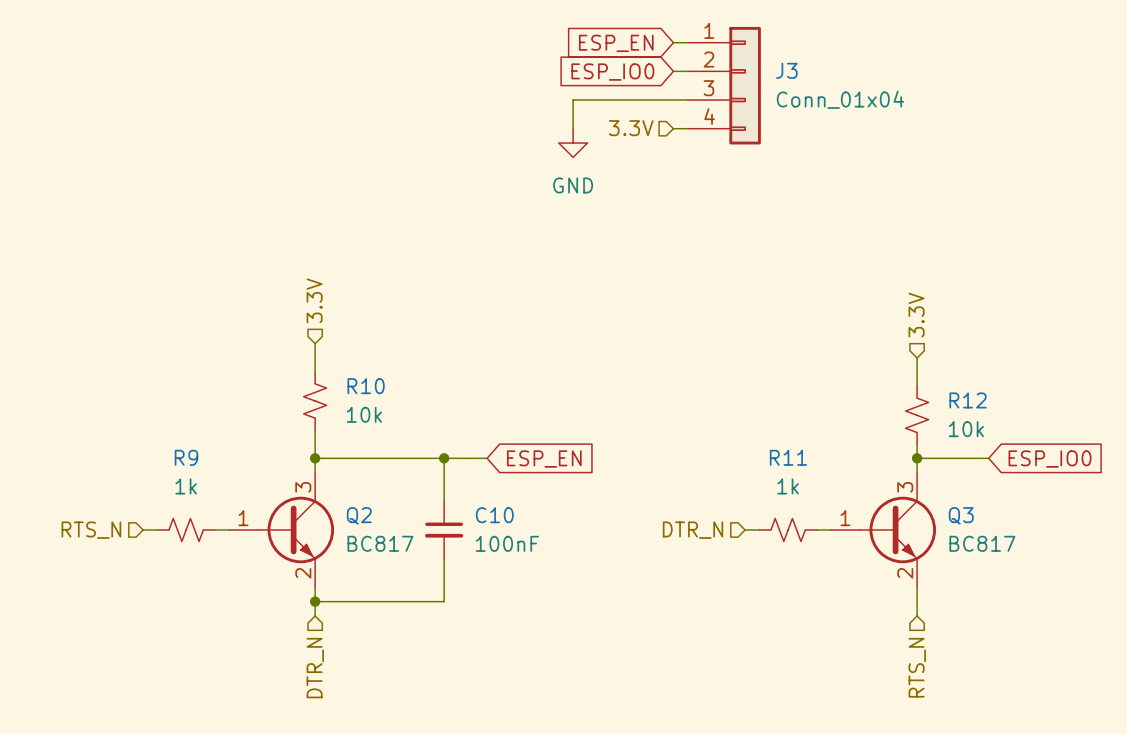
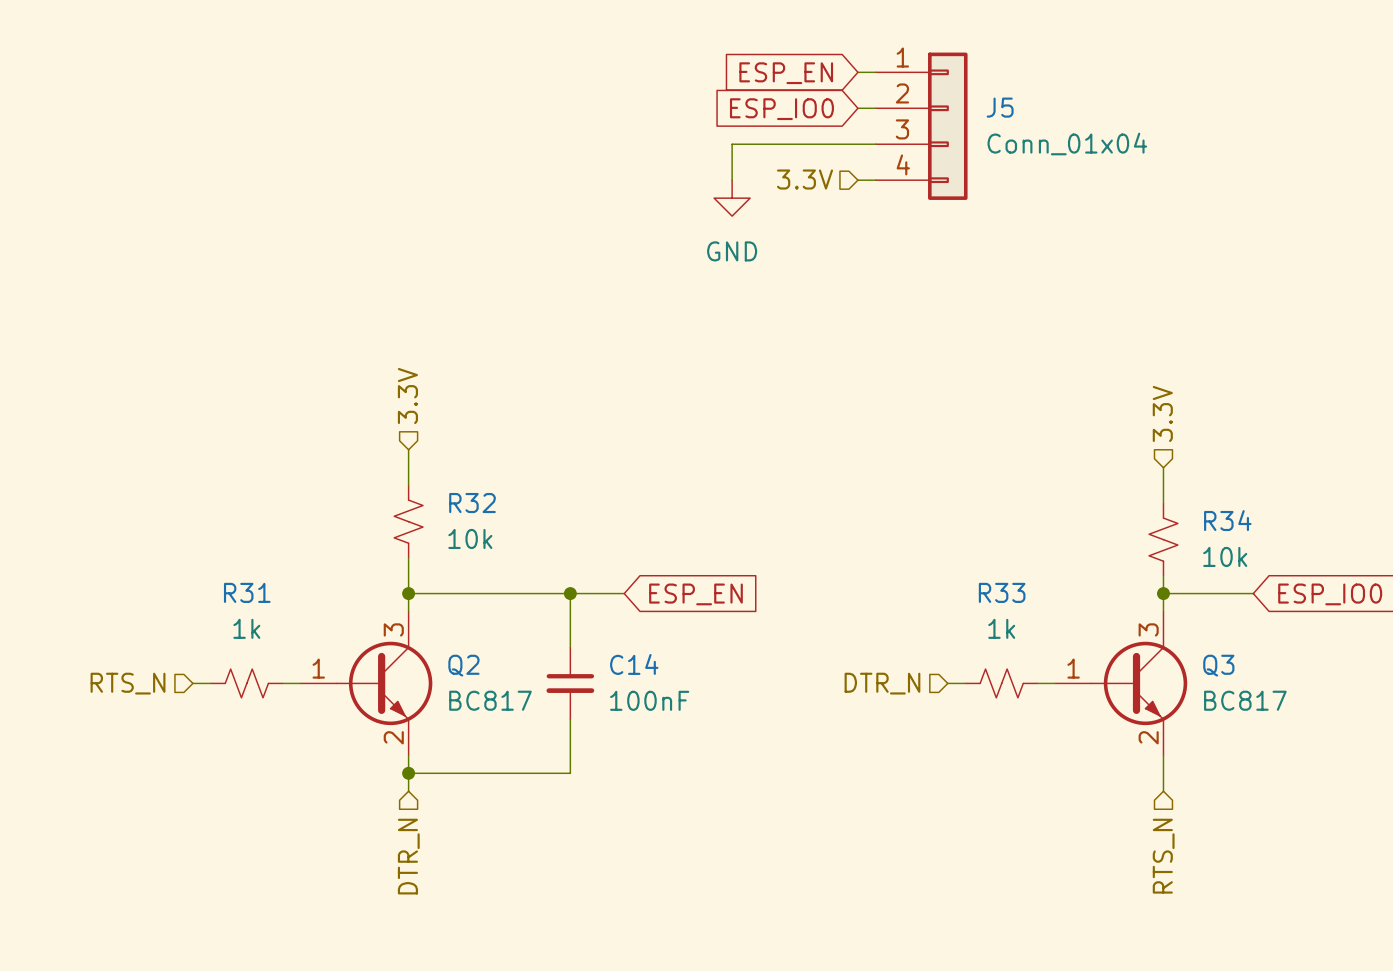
J3 name: J3 (786, 70) -> J5 (1000, 107)
R10 name: R10 (366, 386) -> R32 (472, 503)
R12 name: R12 (968, 400) -> R34 (1227, 520)
R9 name: R9 (186, 457) -> R31 (247, 592)
R11 name: R11 (788, 457) -> R33 (1002, 592)
C10 name: C10 (494, 515) -> C14 (634, 664)

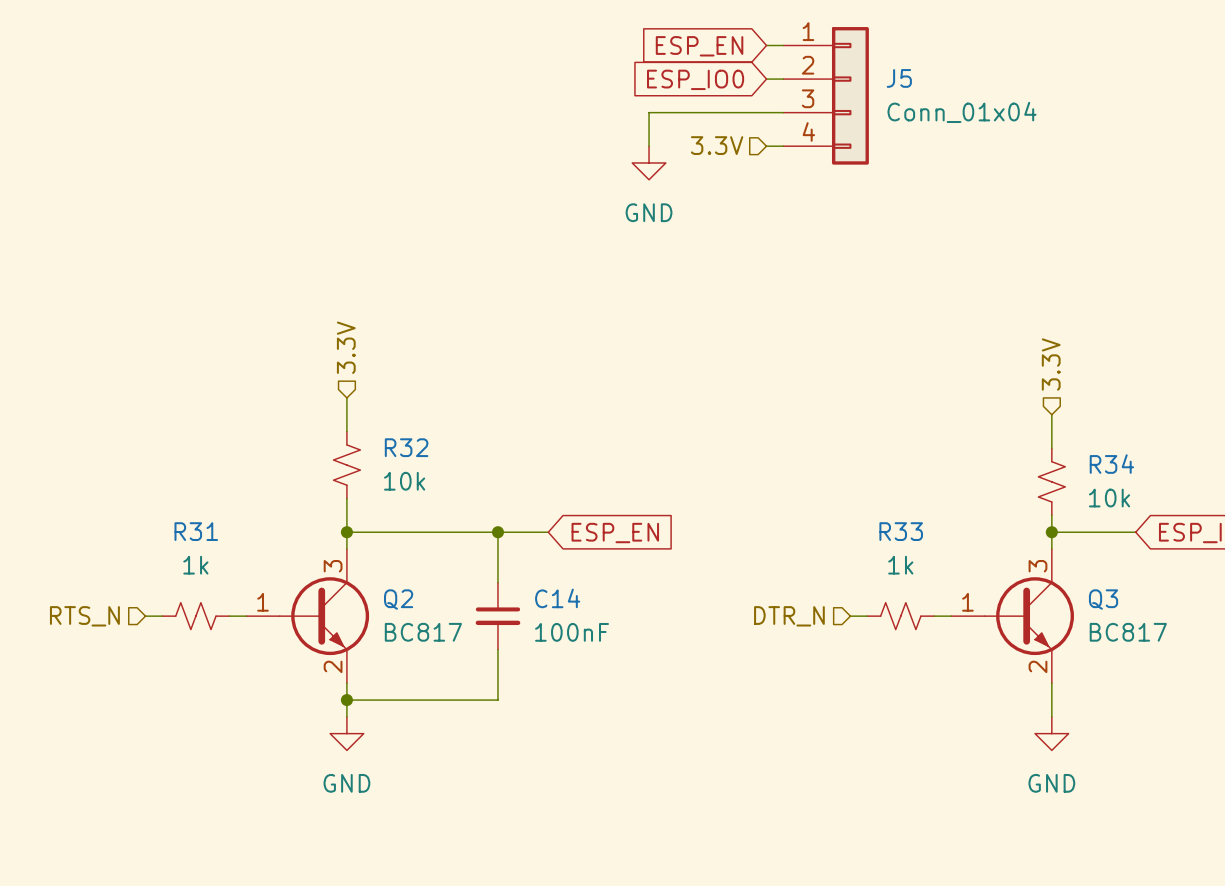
power symbol: none -> GND (346, 733)
power symbol: none -> GND (1051, 733)
hierarchical label: DTR_N (408, 856) -> none
hierarchical label: RTS_N (1163, 856) -> none

